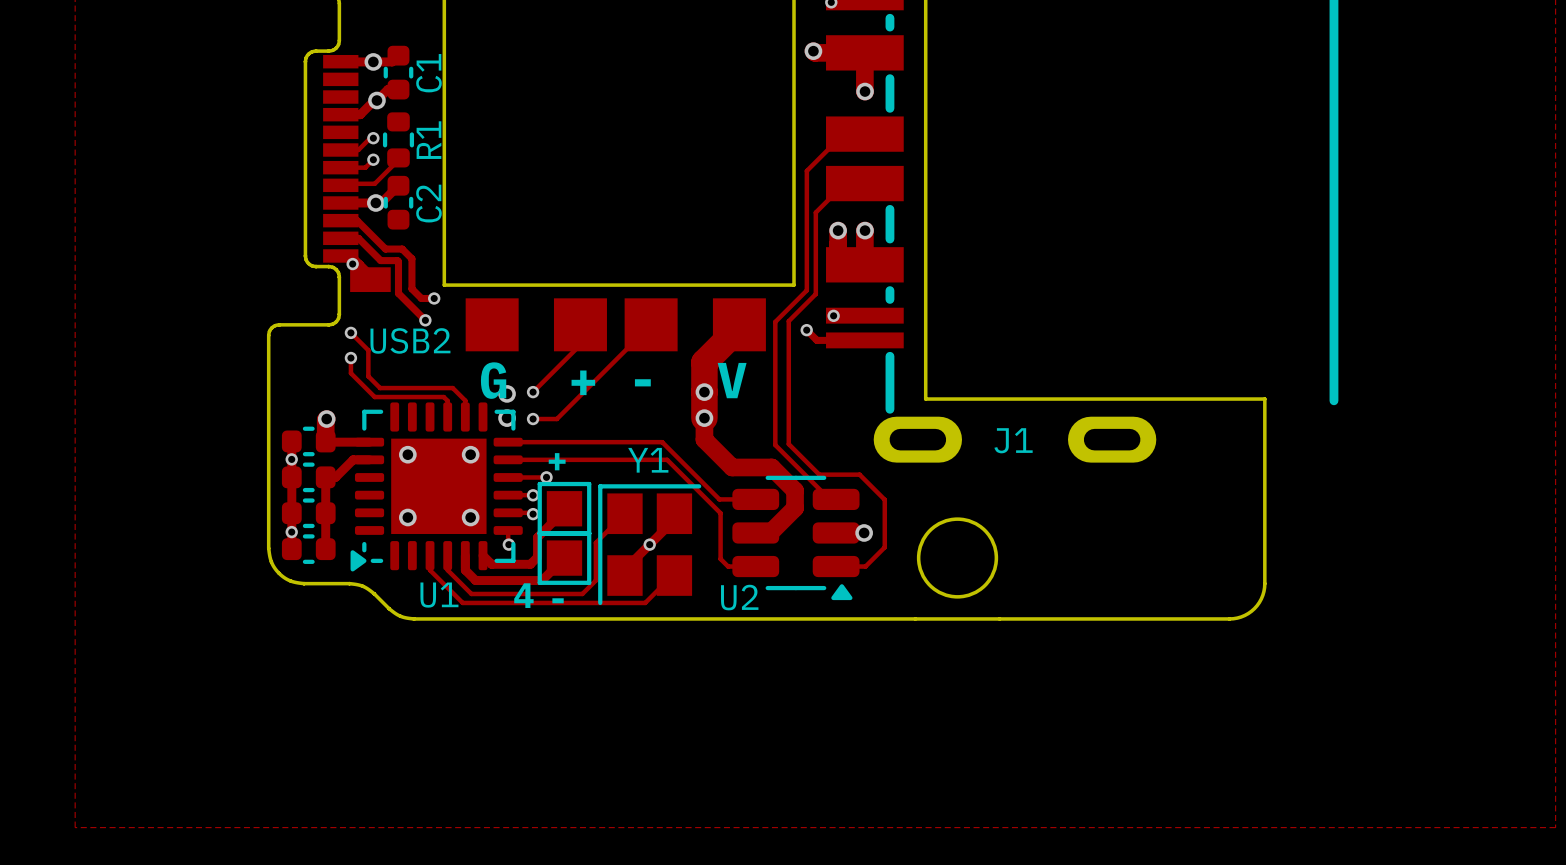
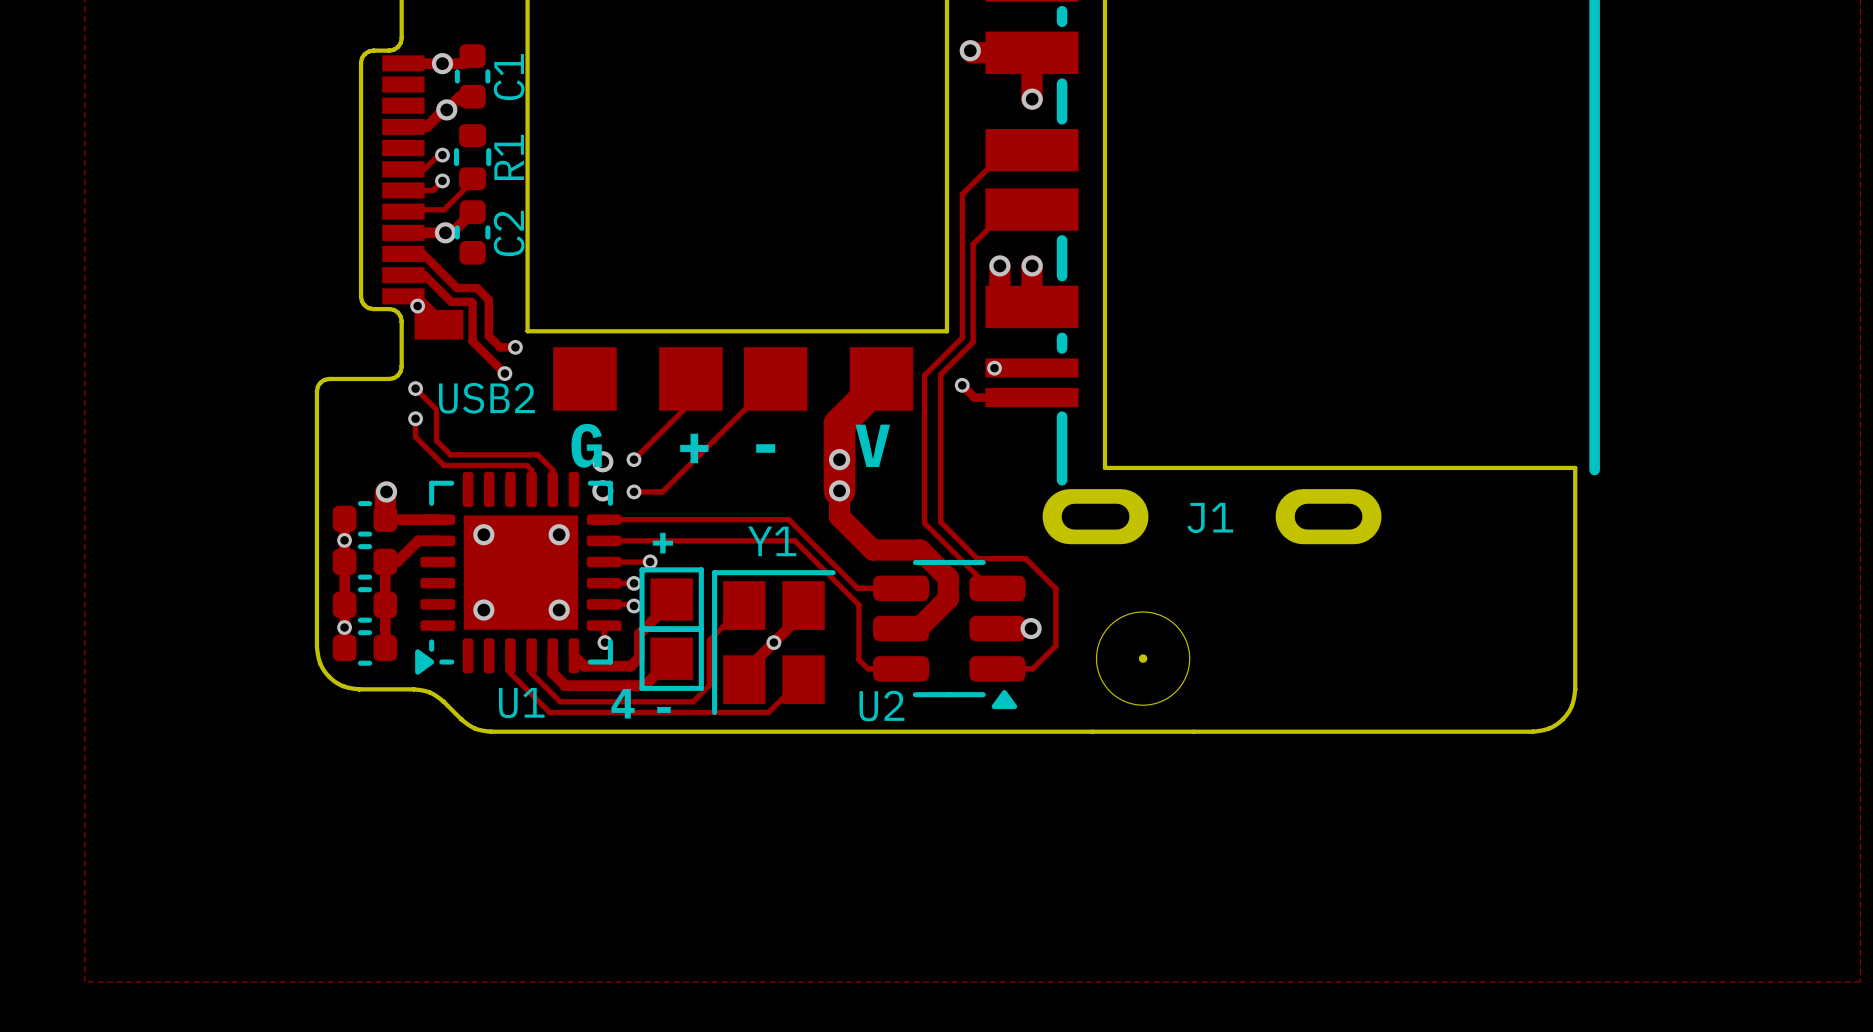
board edge: (1264, 399) (1264, 587) (1261, 598) (1251, 611) (1241, 616) (1229, 618) (999, 618) -> (1511, 467) (1575, 467) (1575, 689) (1570, 708) (1559, 722) (1548, 728) (1532, 731) (1193, 731)
round board edge size: [916, 517, 999, 599] -> [1138, 654, 1148, 663]

